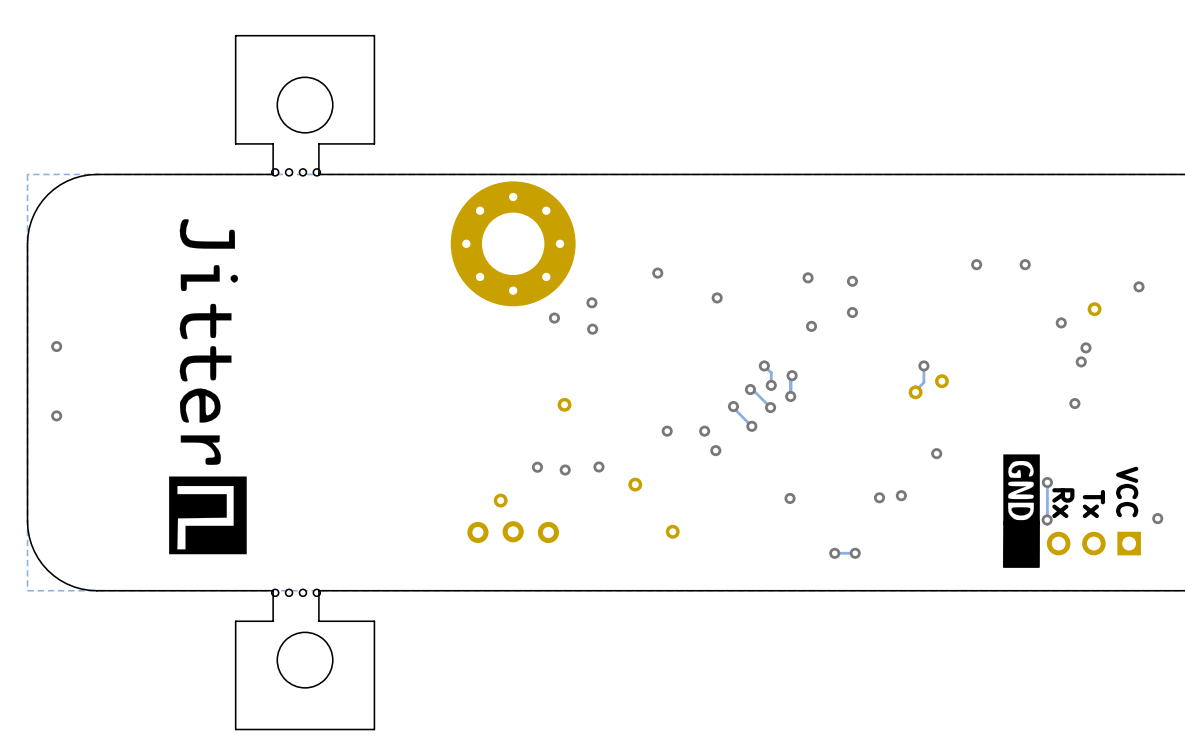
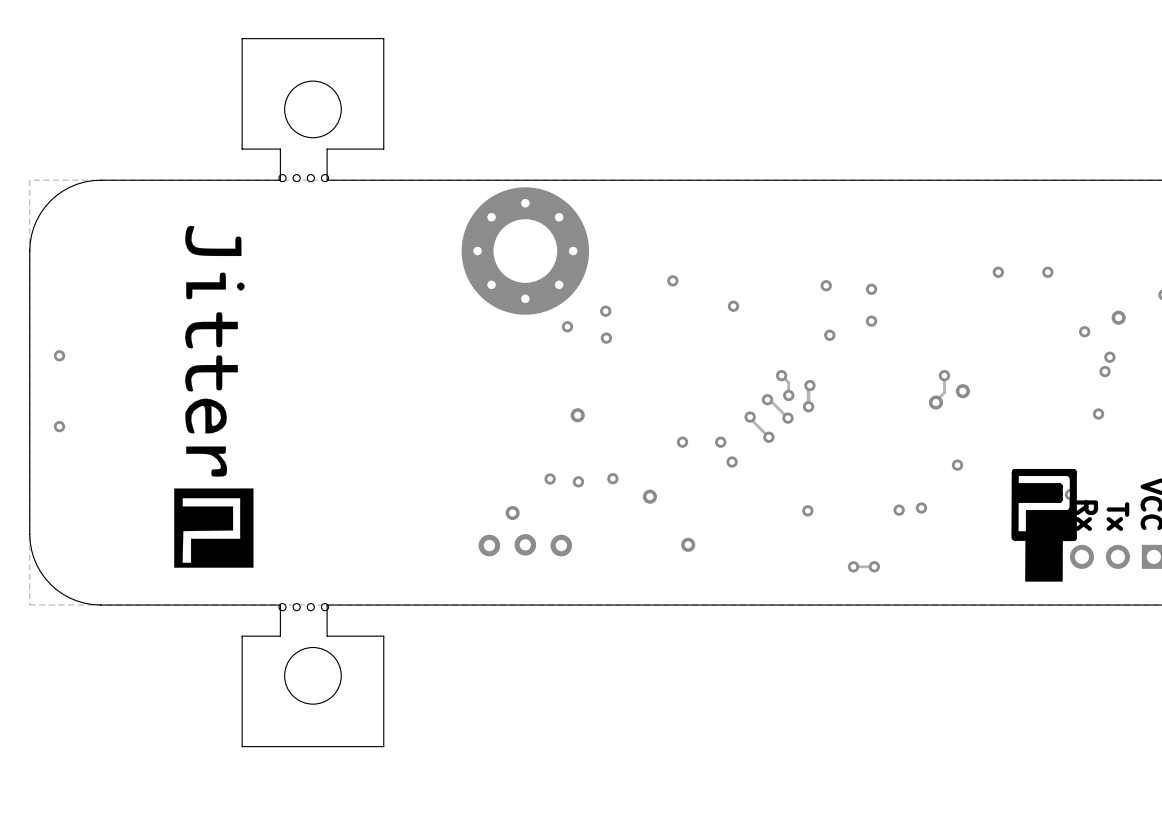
drawing shape: [1003, 454, 1040, 526] -> [1011, 468, 1077, 542]

